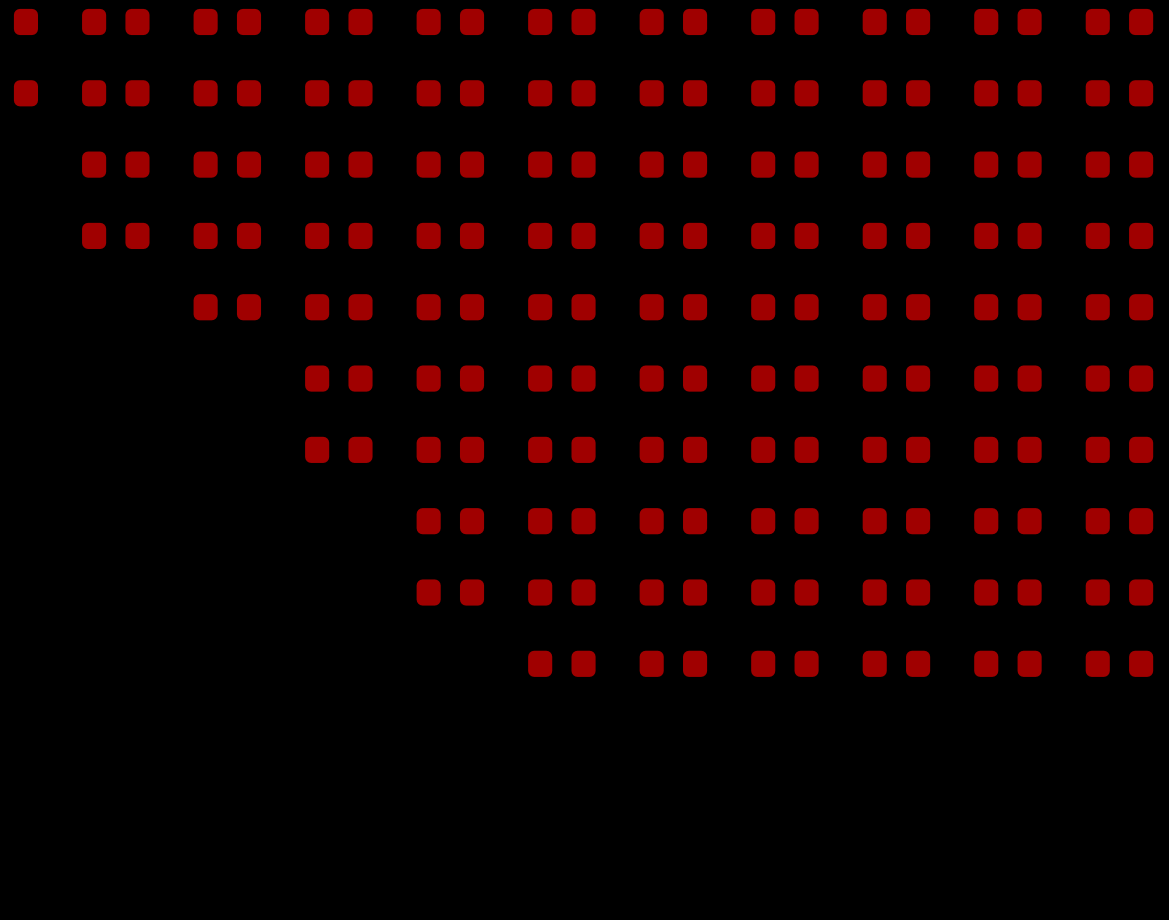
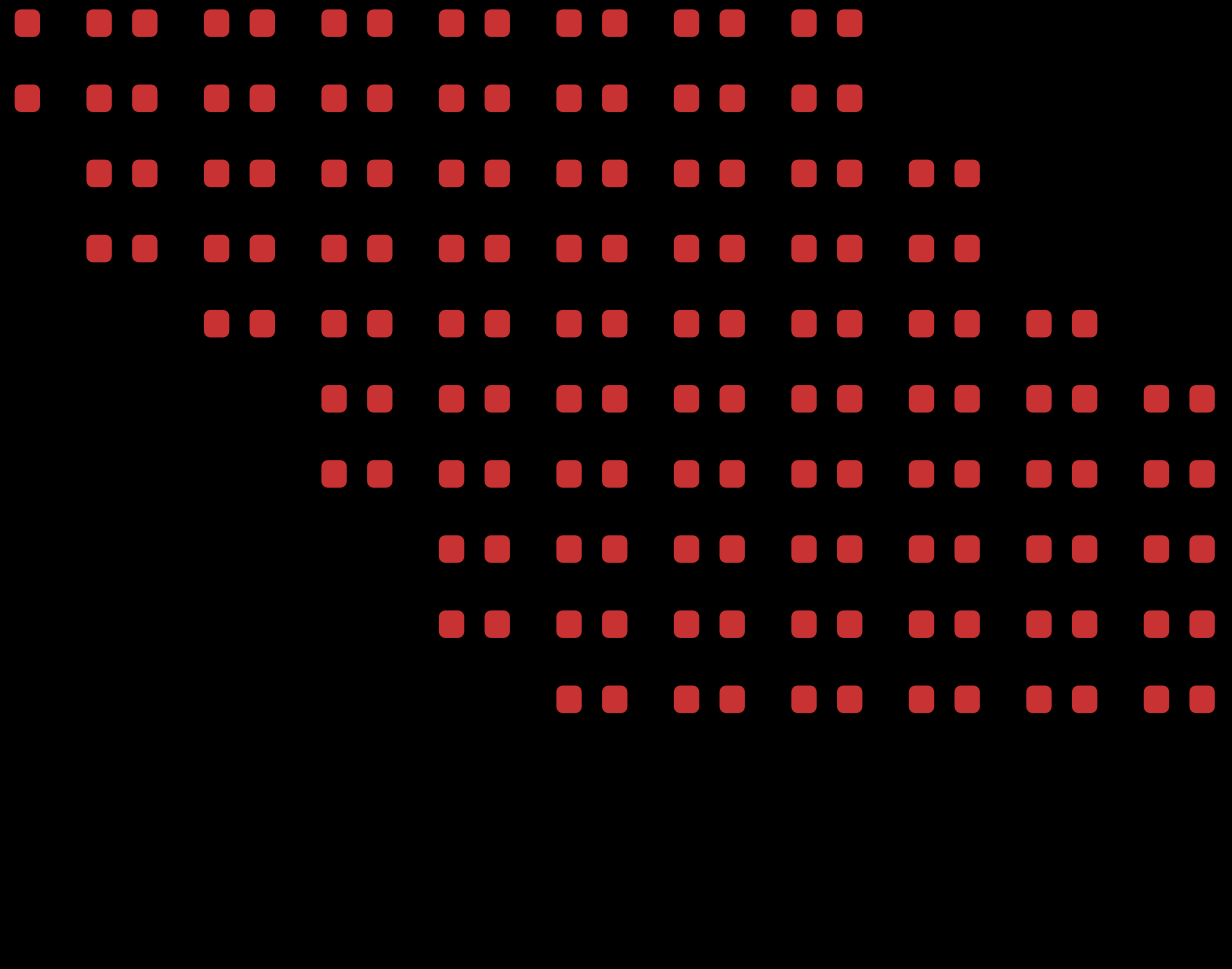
part: (896, 21) -> none
part: (1007, 21) -> none
part: (1119, 21) -> none
part: (896, 93) -> none
part: (1007, 93) -> none
part: (1119, 93) -> none
part: (1007, 164) -> none
part: (1119, 164) -> none
part: (1007, 235) -> none
part: (1119, 235) -> none
part: (1119, 307) -> none

